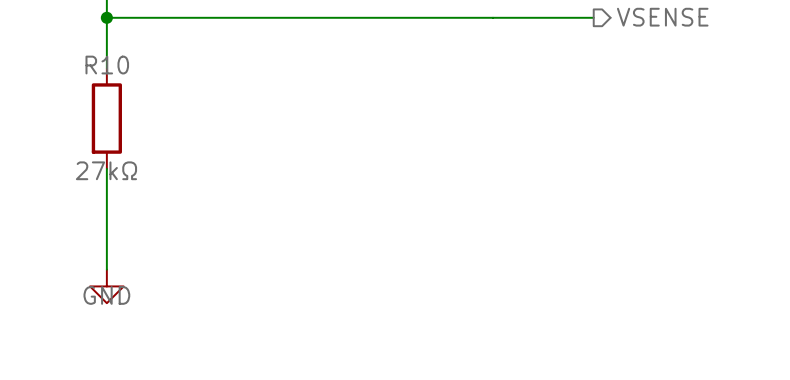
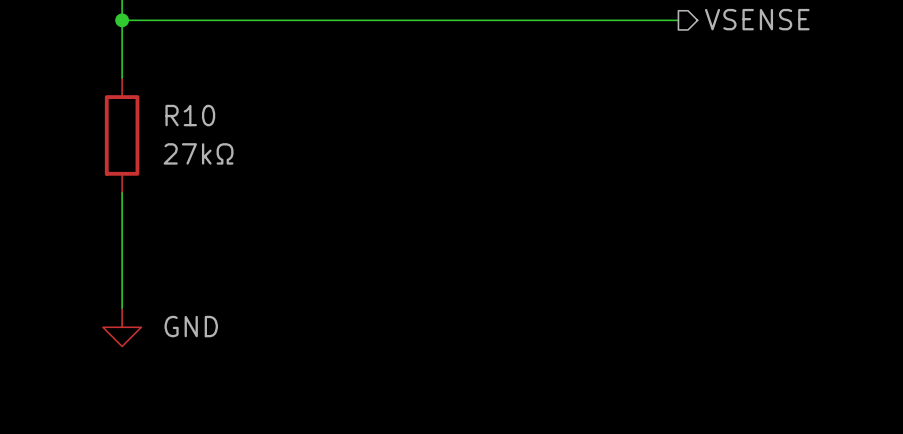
R10 name position: R10 (107, 65) -> R10 (190, 115)
R10 value position: 27kΩ (106, 170) -> 27kΩ (198, 153)
power symbol text position: GND (106, 295) -> GND (191, 326)

